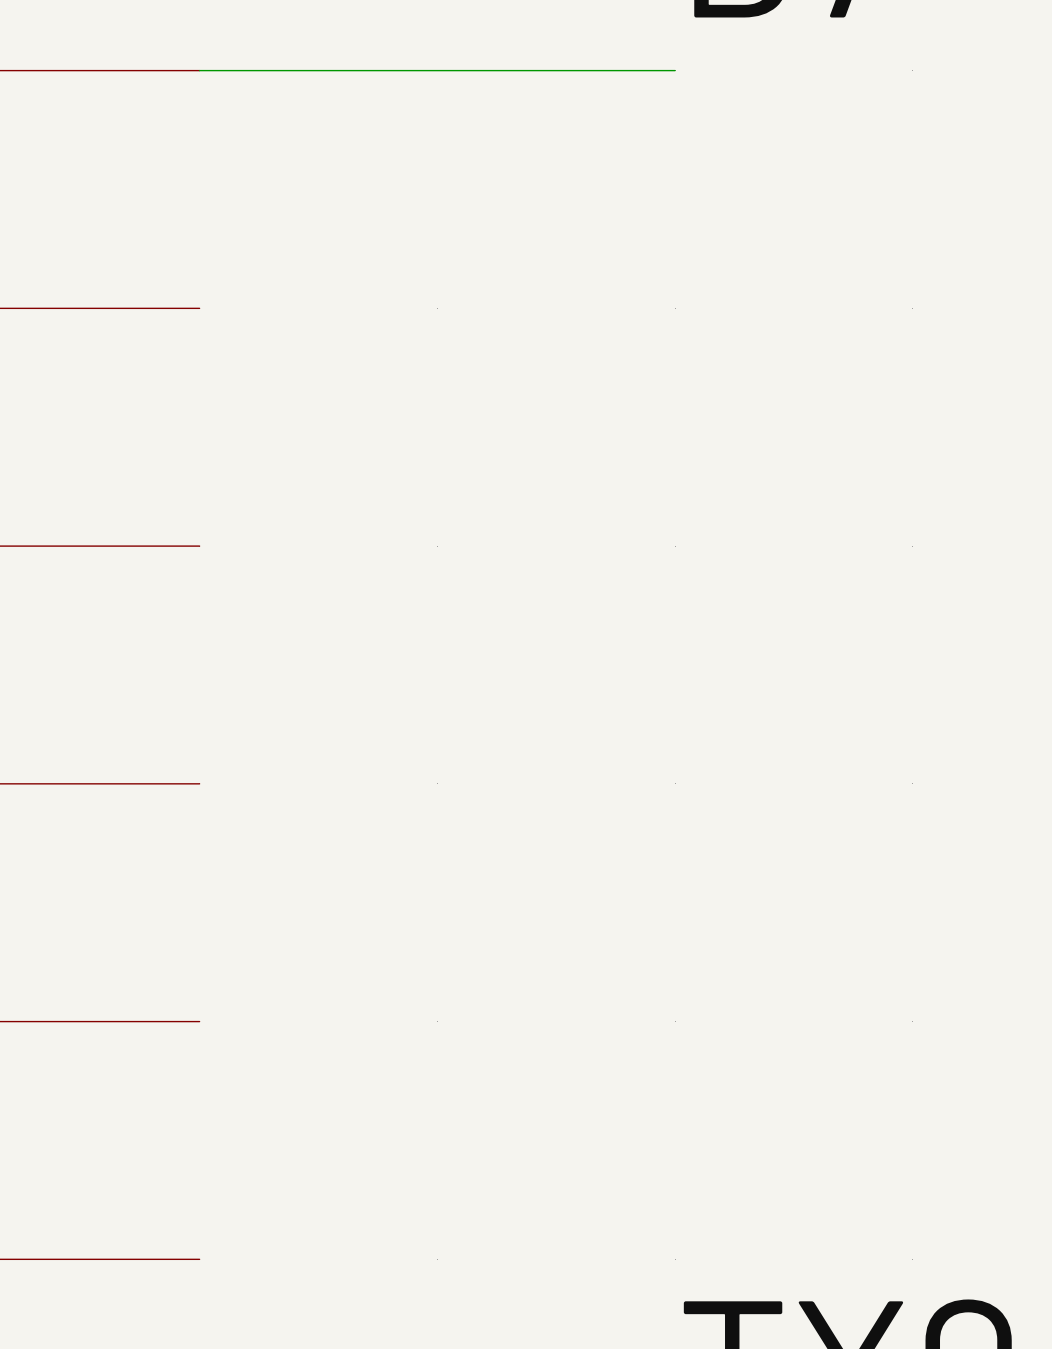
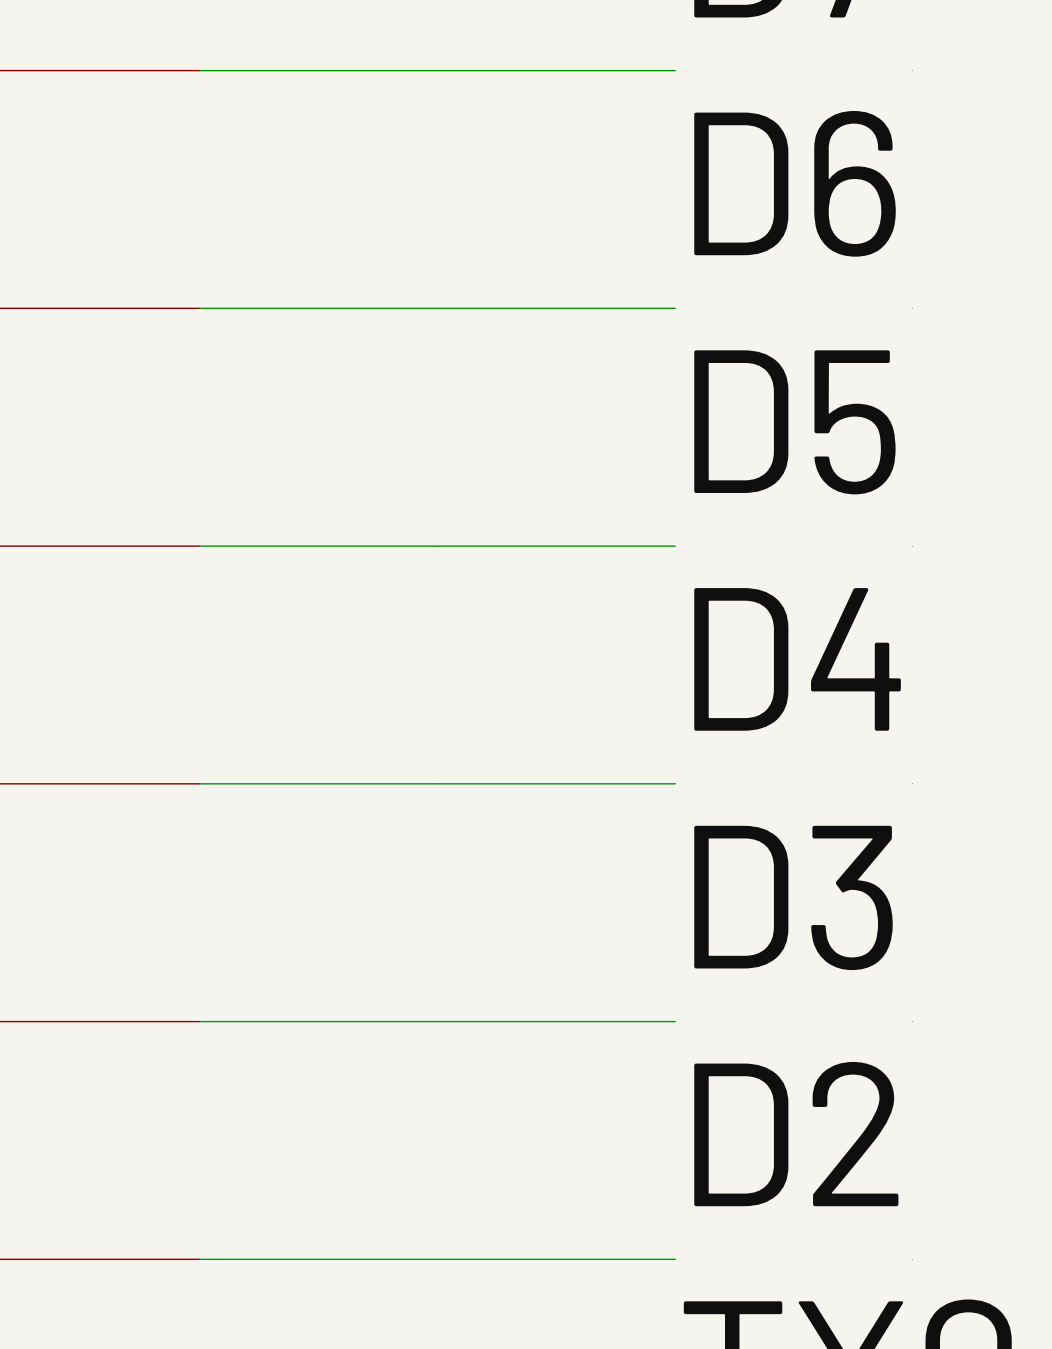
label: none -> D6 (795, 183)
wire: none -> (199, 308) (675, 308)
label: none -> D5 (794, 422)
wire: none -> (199, 546) (675, 546)
label: none -> D4 (797, 659)
wire: none -> (199, 783) (675, 783)
label: none -> D3 (793, 897)
wire: none -> (199, 1021) (675, 1021)
label: none -> D2 (796, 1134)
wire: none -> (199, 1259) (675, 1259)

